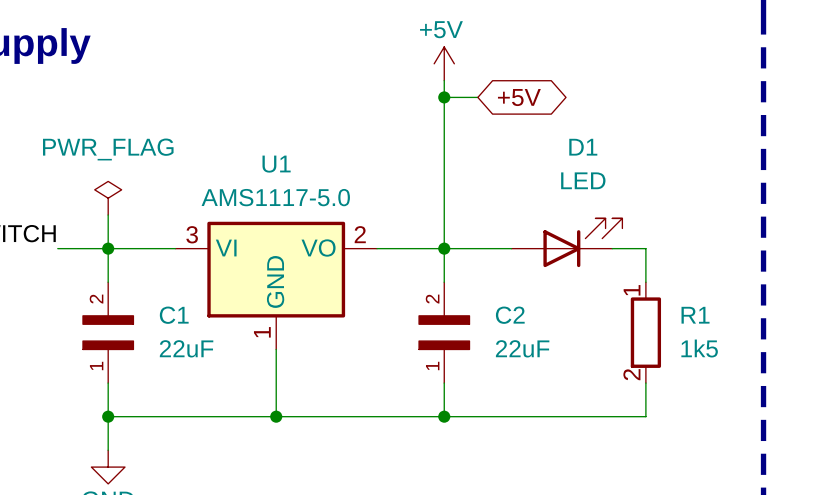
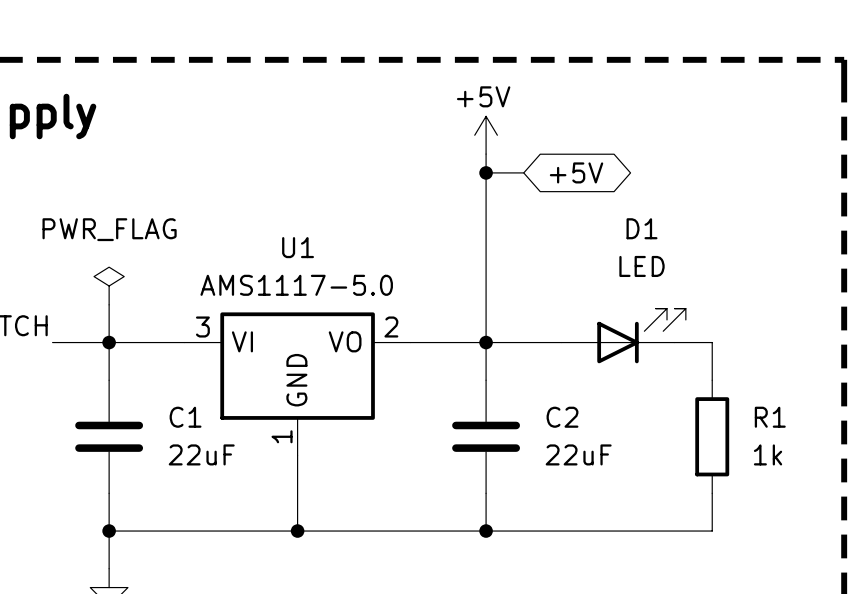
C1 symbol: [82, 282, 135, 384] -> [75, 380, 144, 494]
C2 symbol: [418, 282, 471, 384] -> [452, 380, 520, 494]
R1 pin number: 1 (632, 290) -> none
R1 value: 1k5 (699, 348) -> 1k (768, 454)
R1 pin number: 2 (631, 374) -> none

